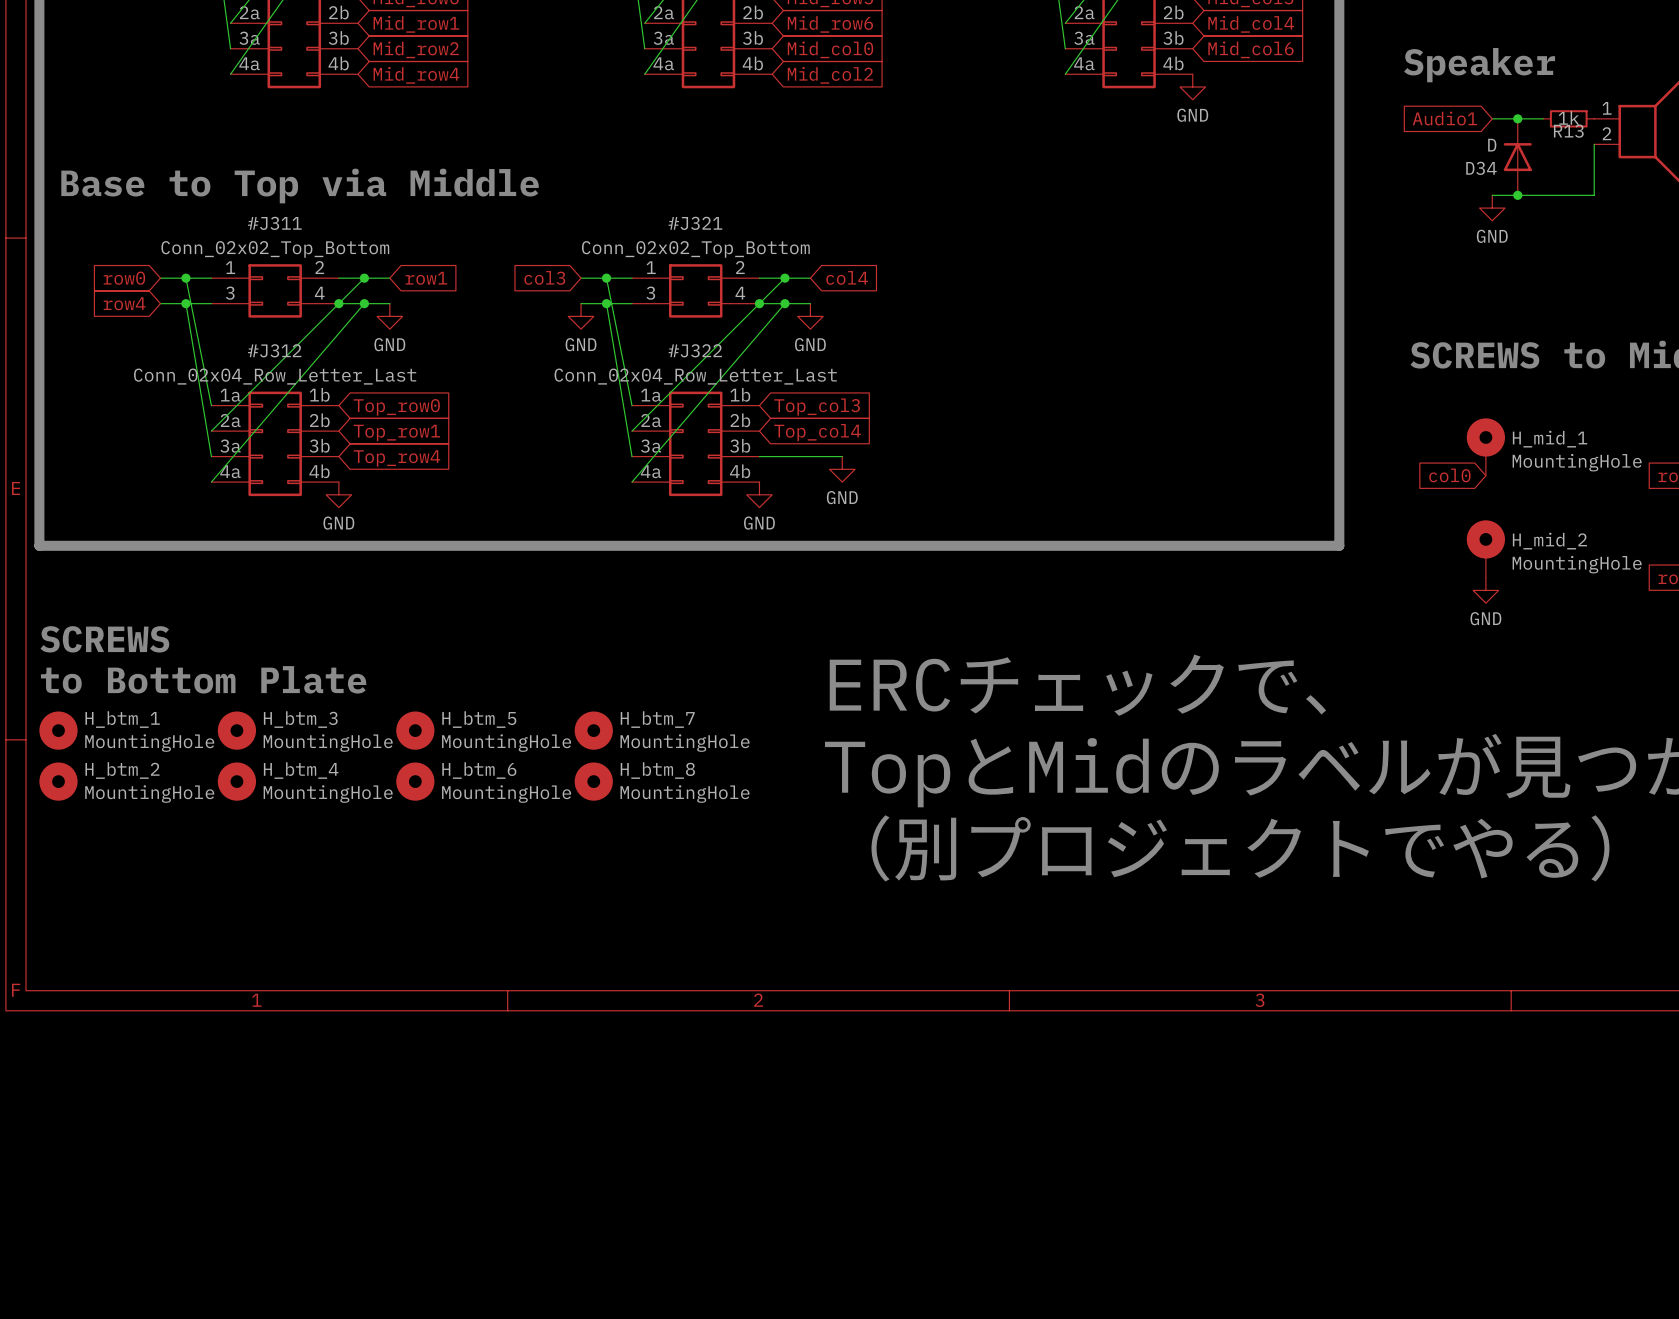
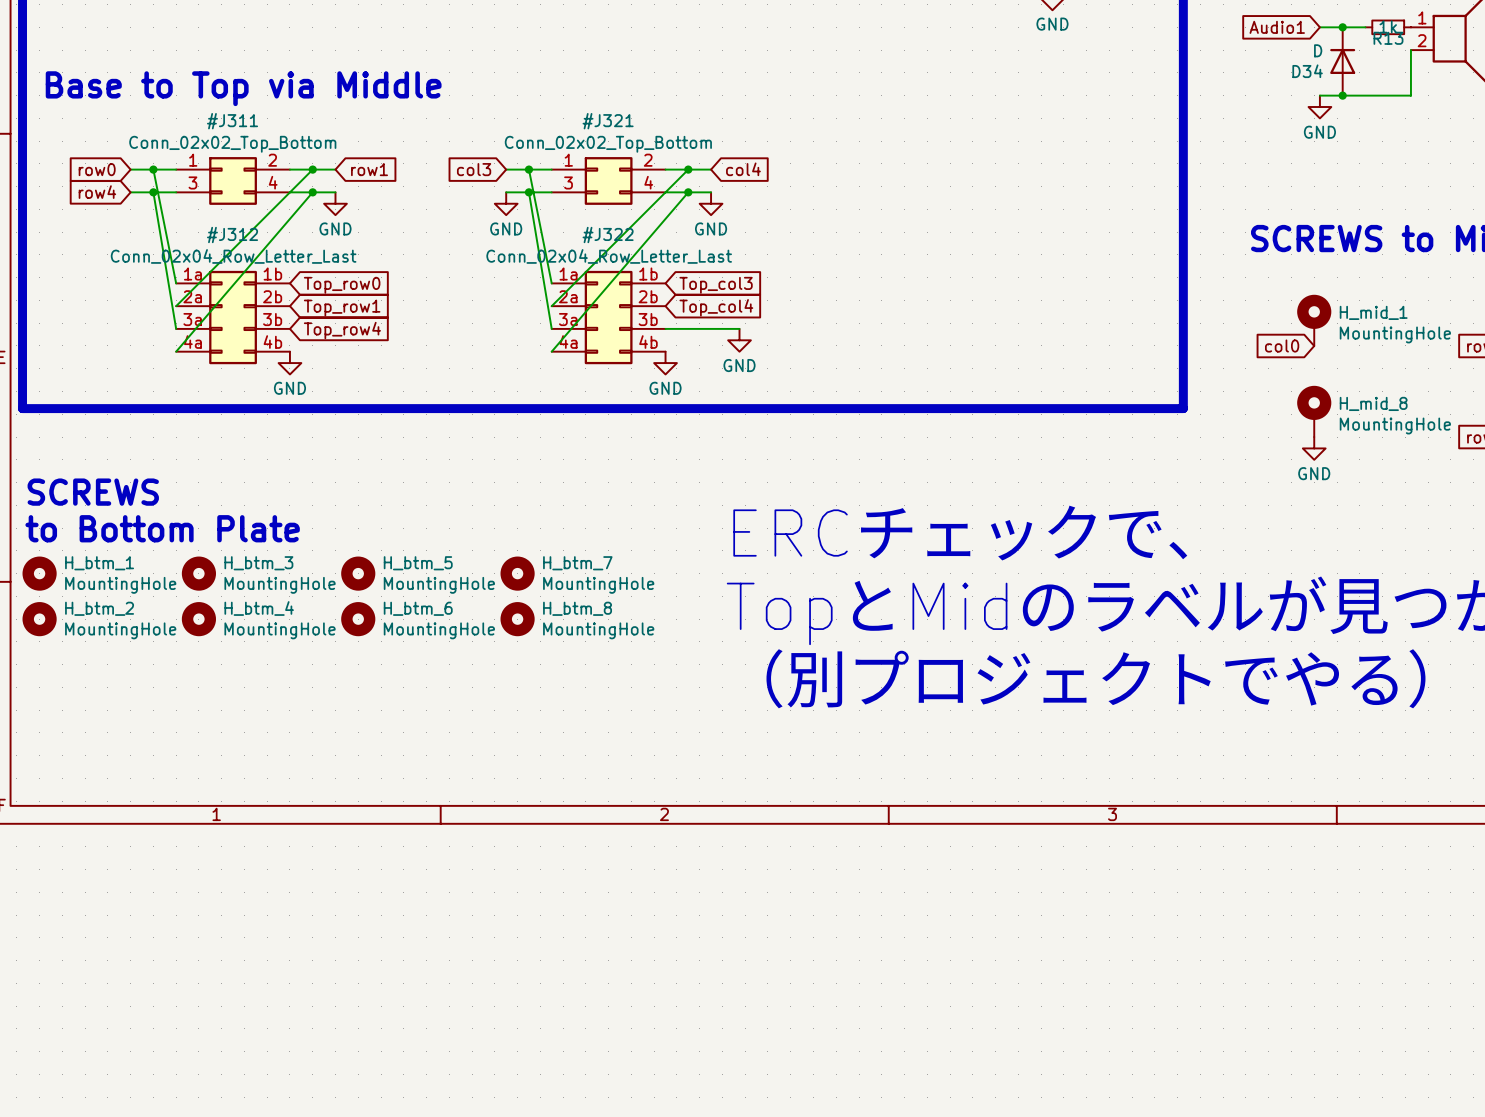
junction: (338, 303) -> none
junction: (759, 303) -> none
H_mid_2 name: H_mid_2 (1549, 541) -> H_mid_8 (1373, 403)

